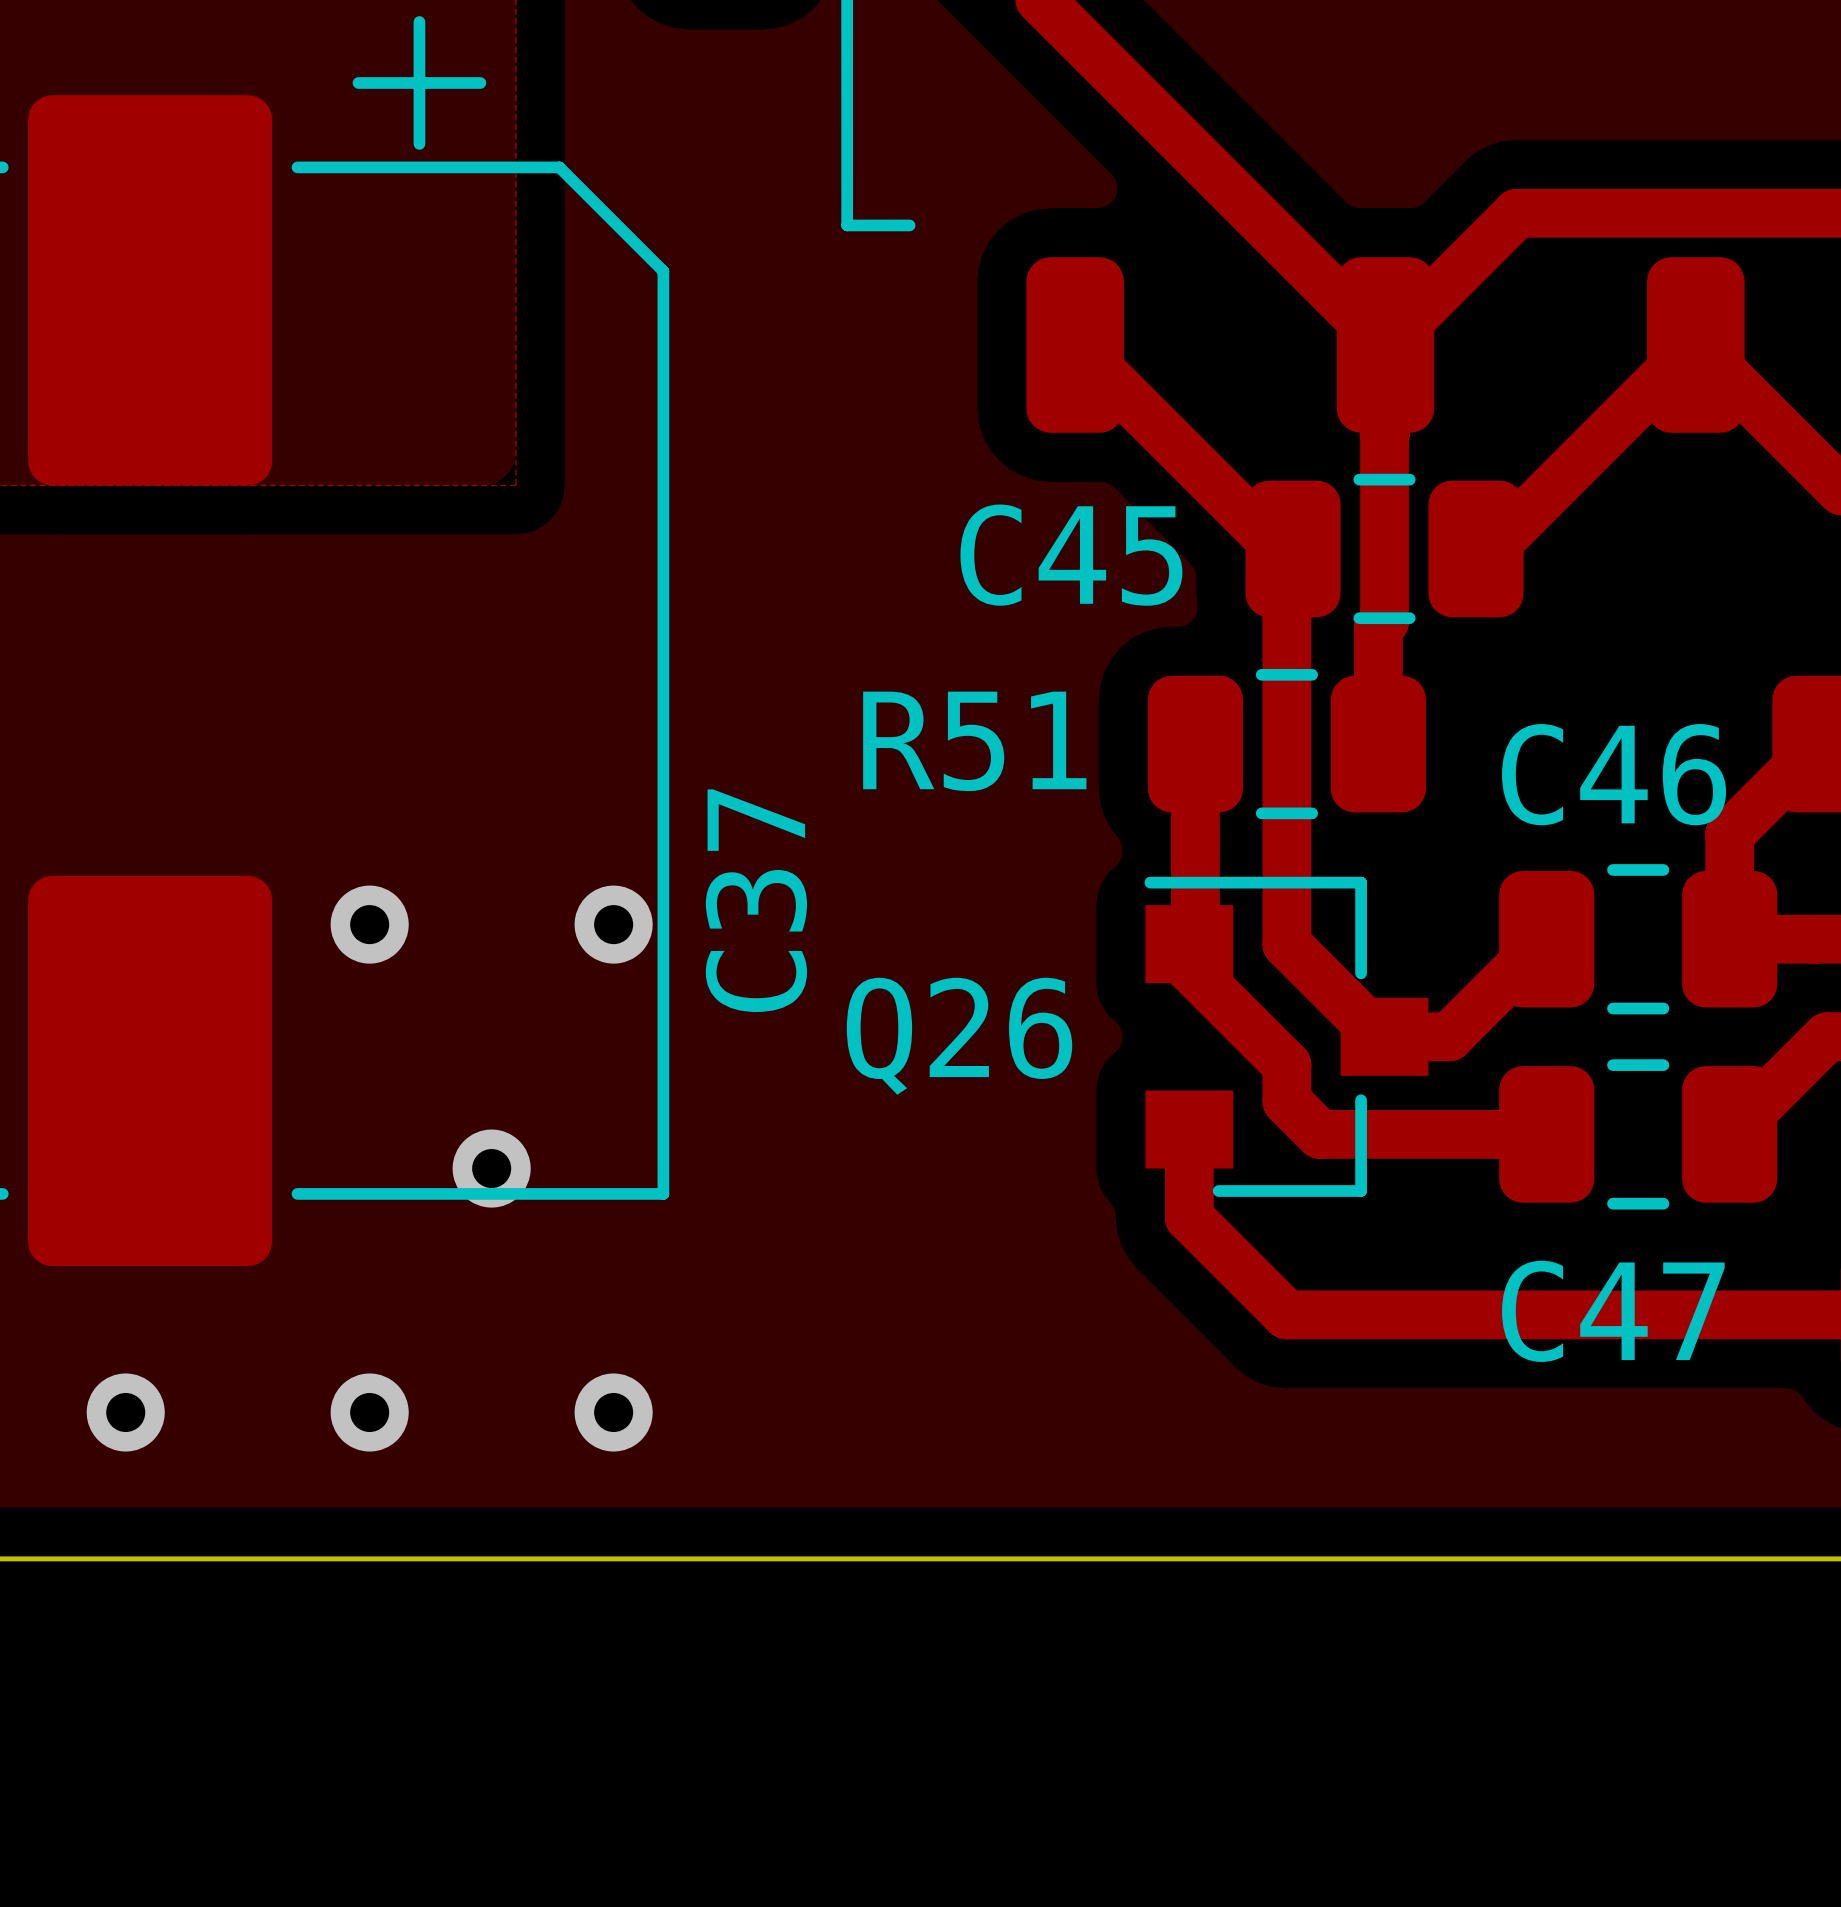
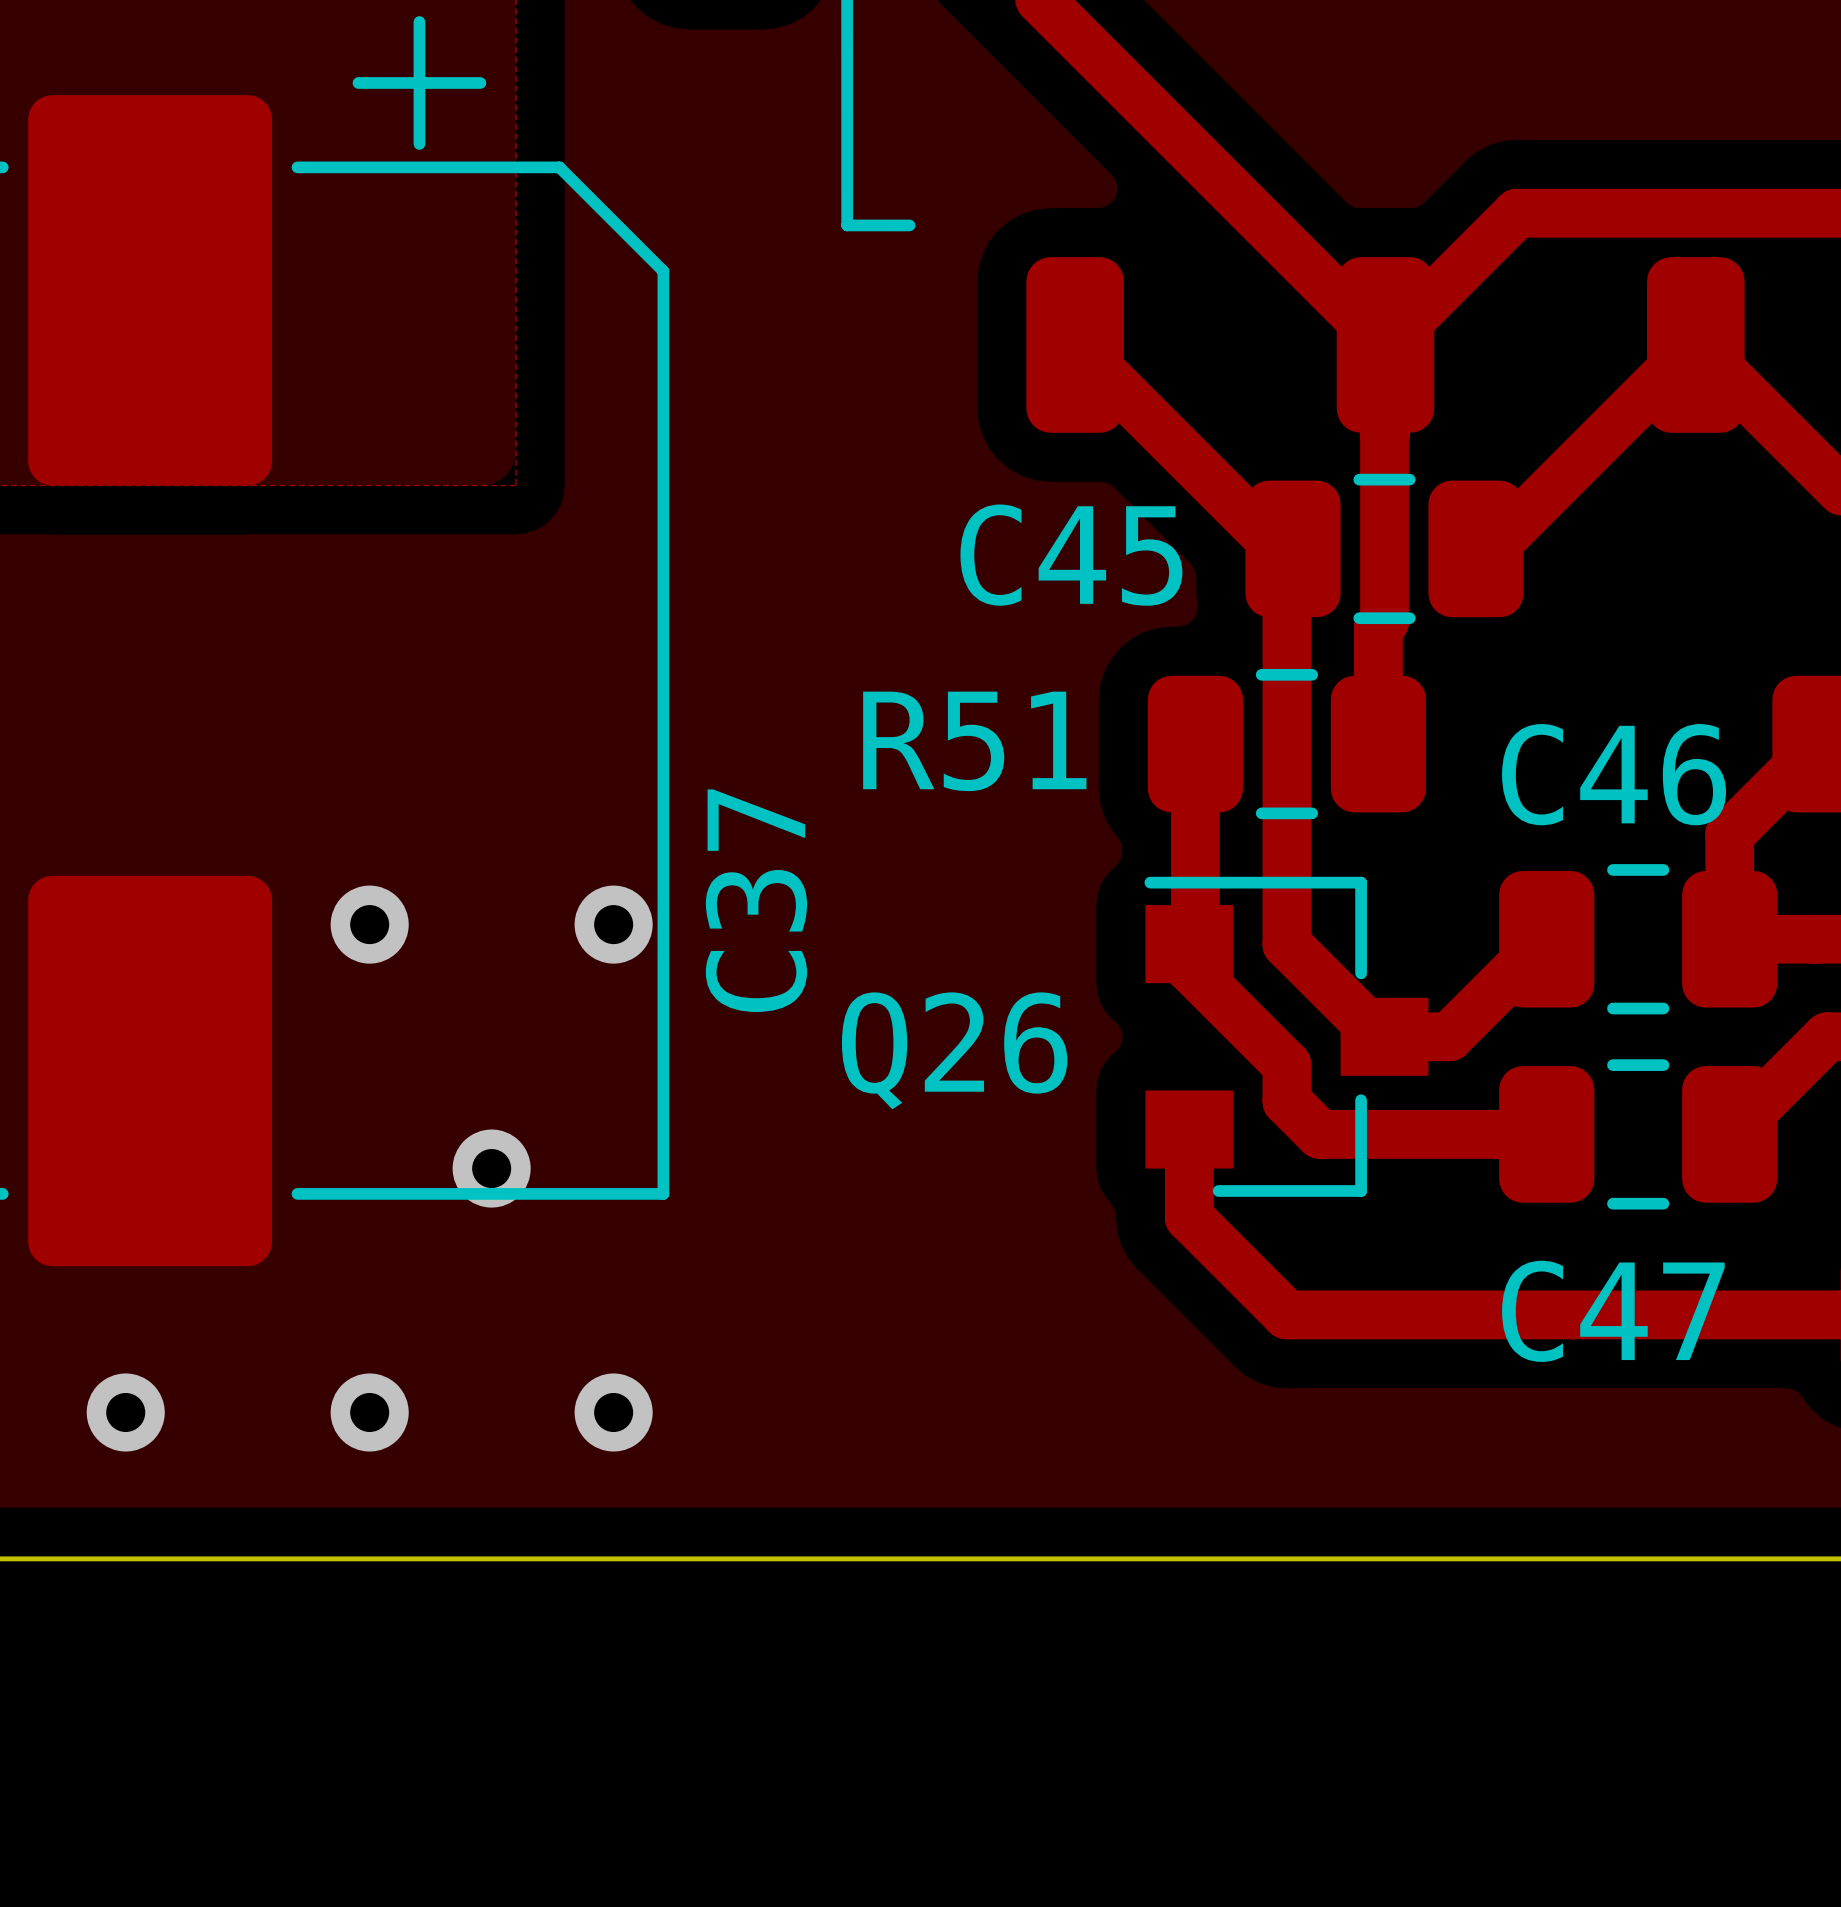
Q26 name position: Q26 (959, 1036) -> Q26 (954, 1050)

